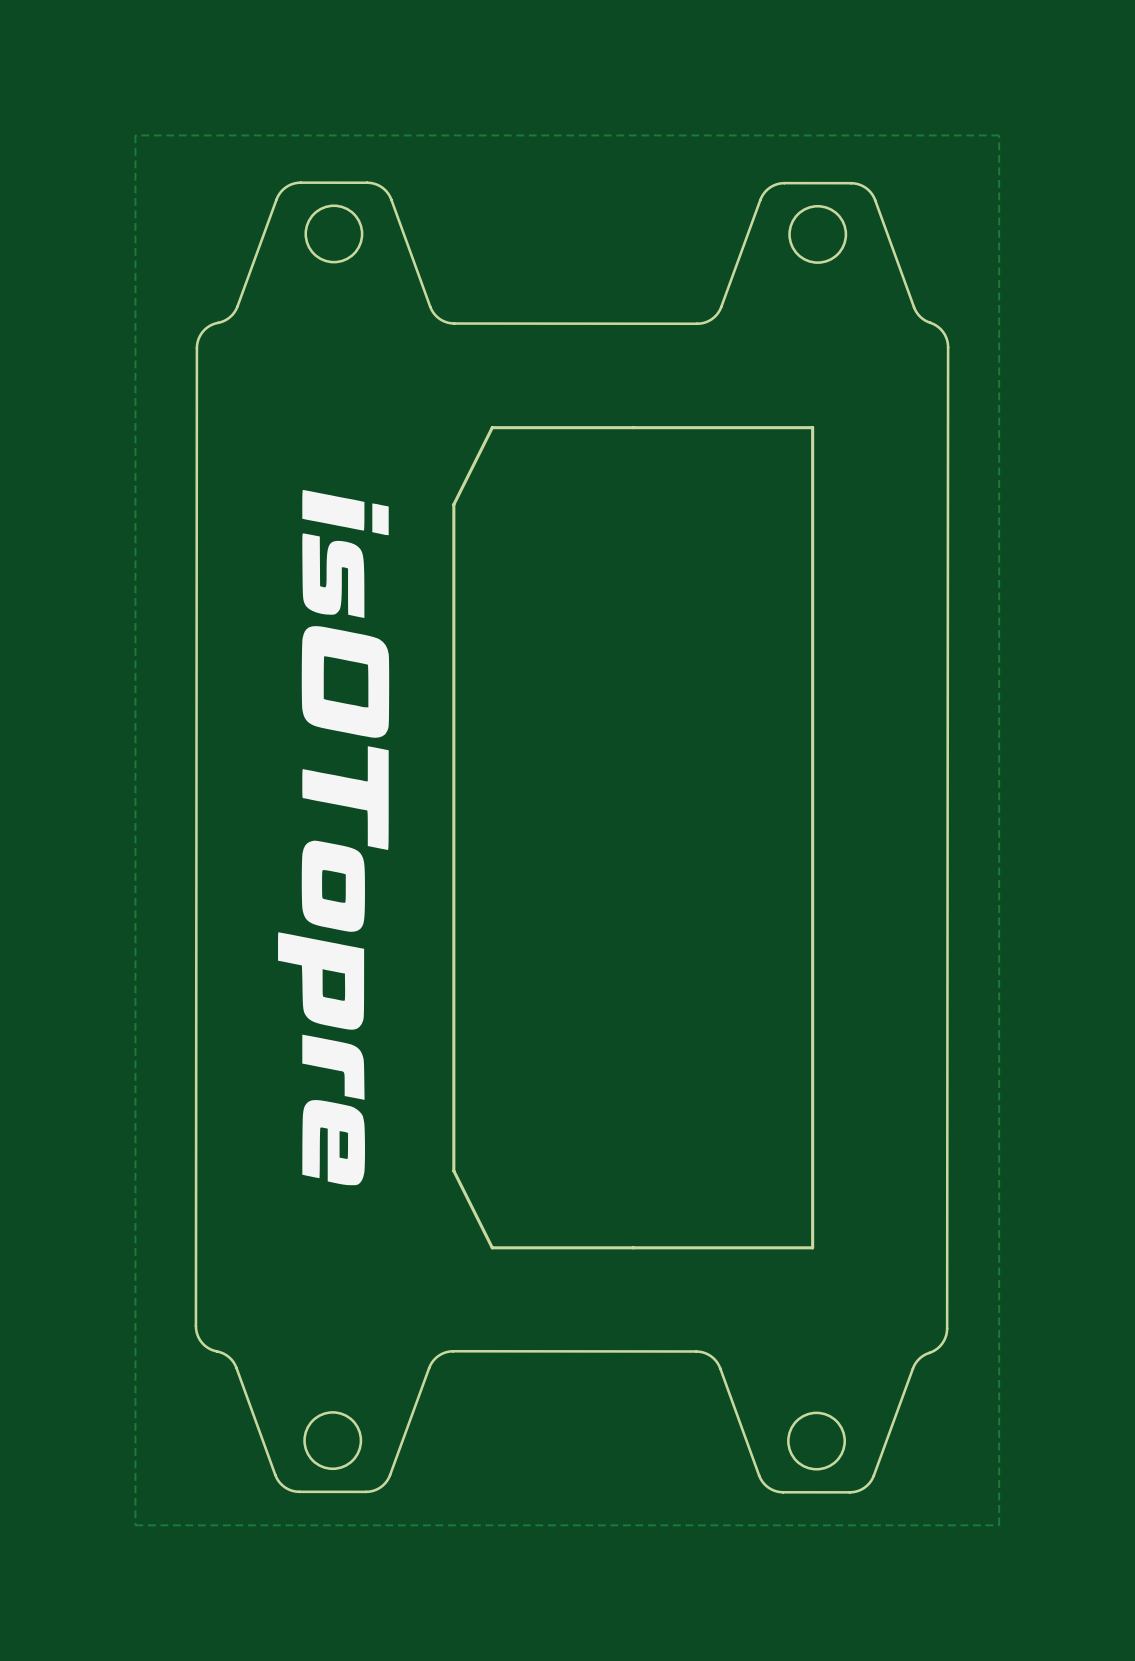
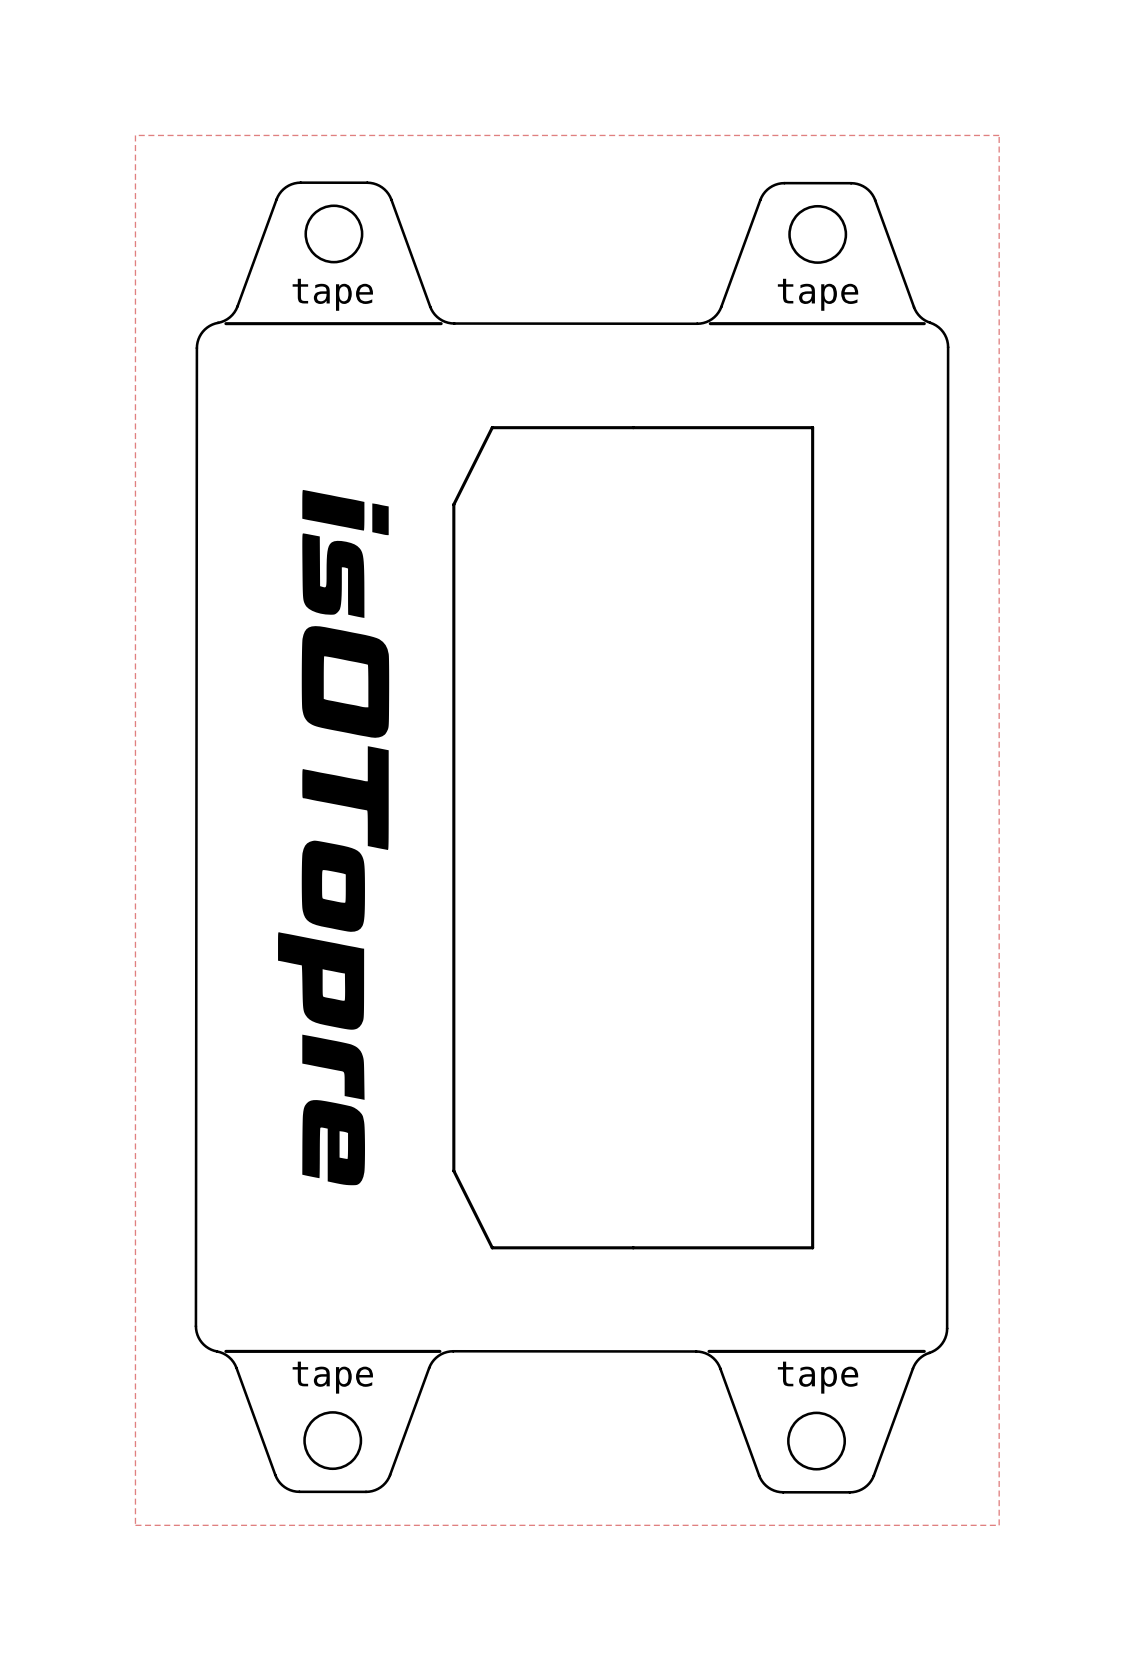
text: none -> tape (332, 294)
text: none -> tape (818, 294)
line: none -> (225, 323) (441, 323)
line: none -> (710, 323) (924, 323)
line: none -> (225, 1351) (439, 1351)
line: none -> (709, 1351) (924, 1351)
text: none -> tape (332, 1377)
text: none -> tape (818, 1377)

